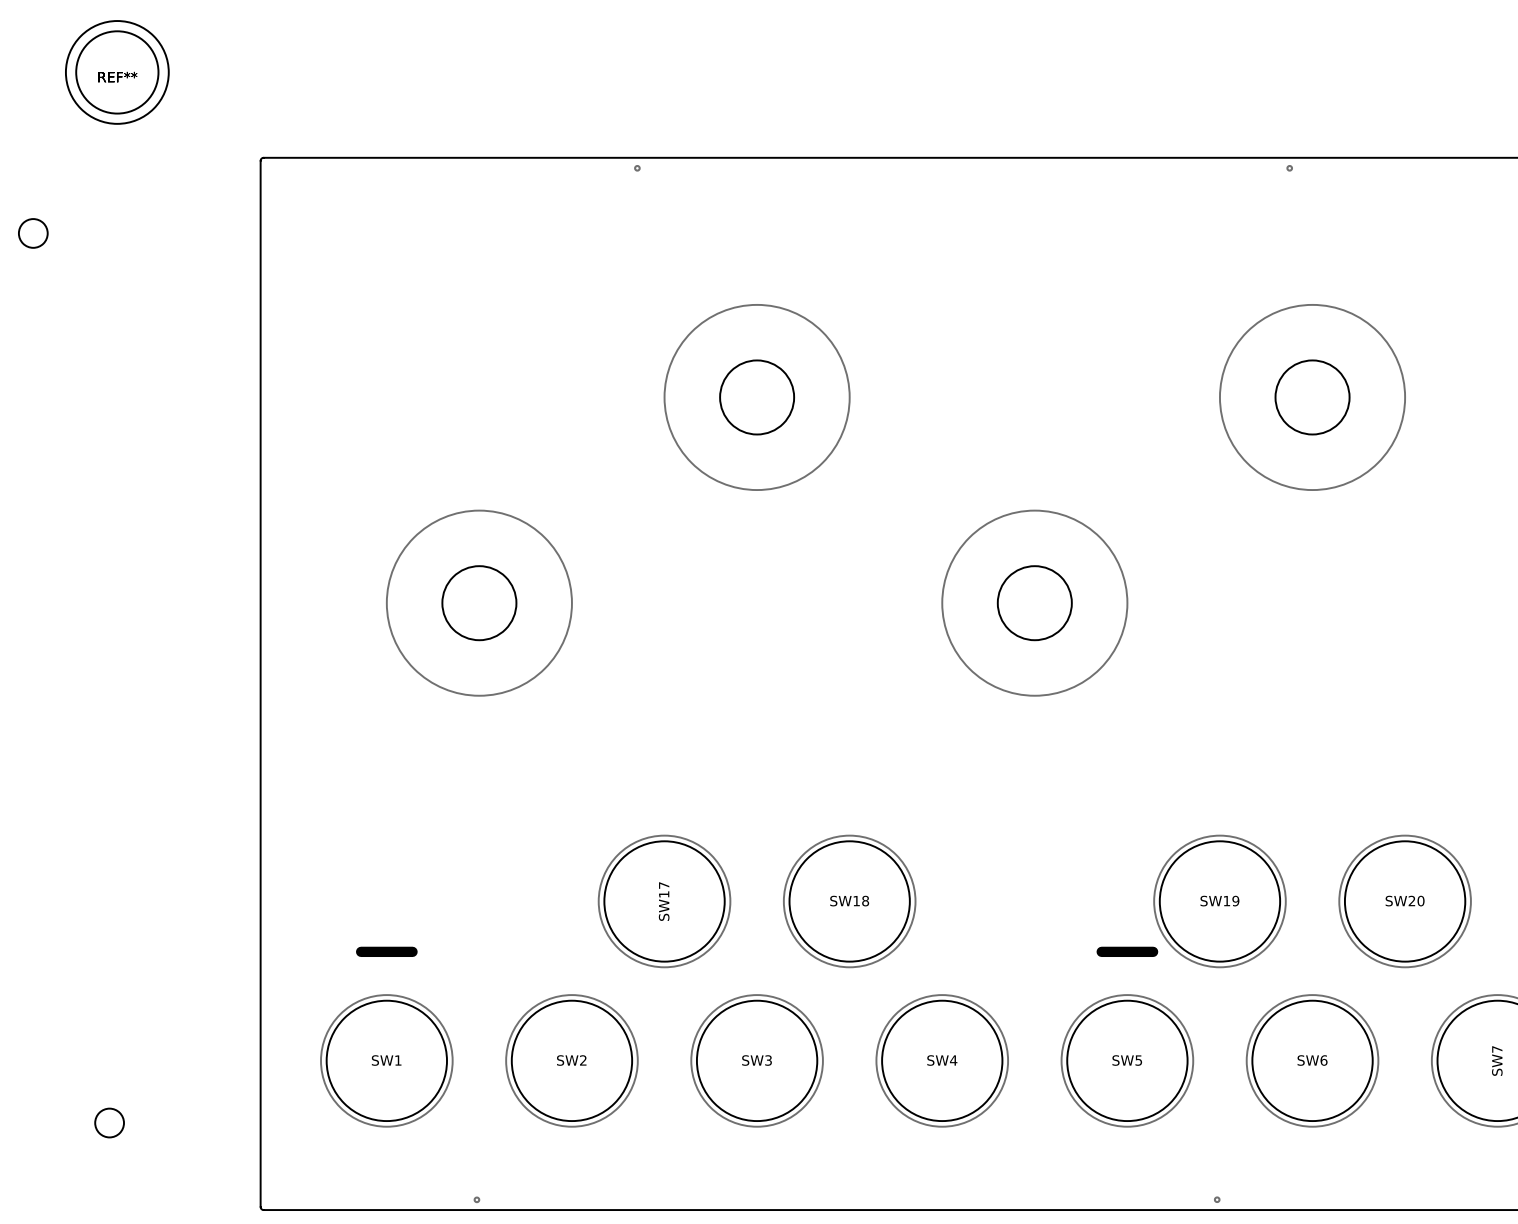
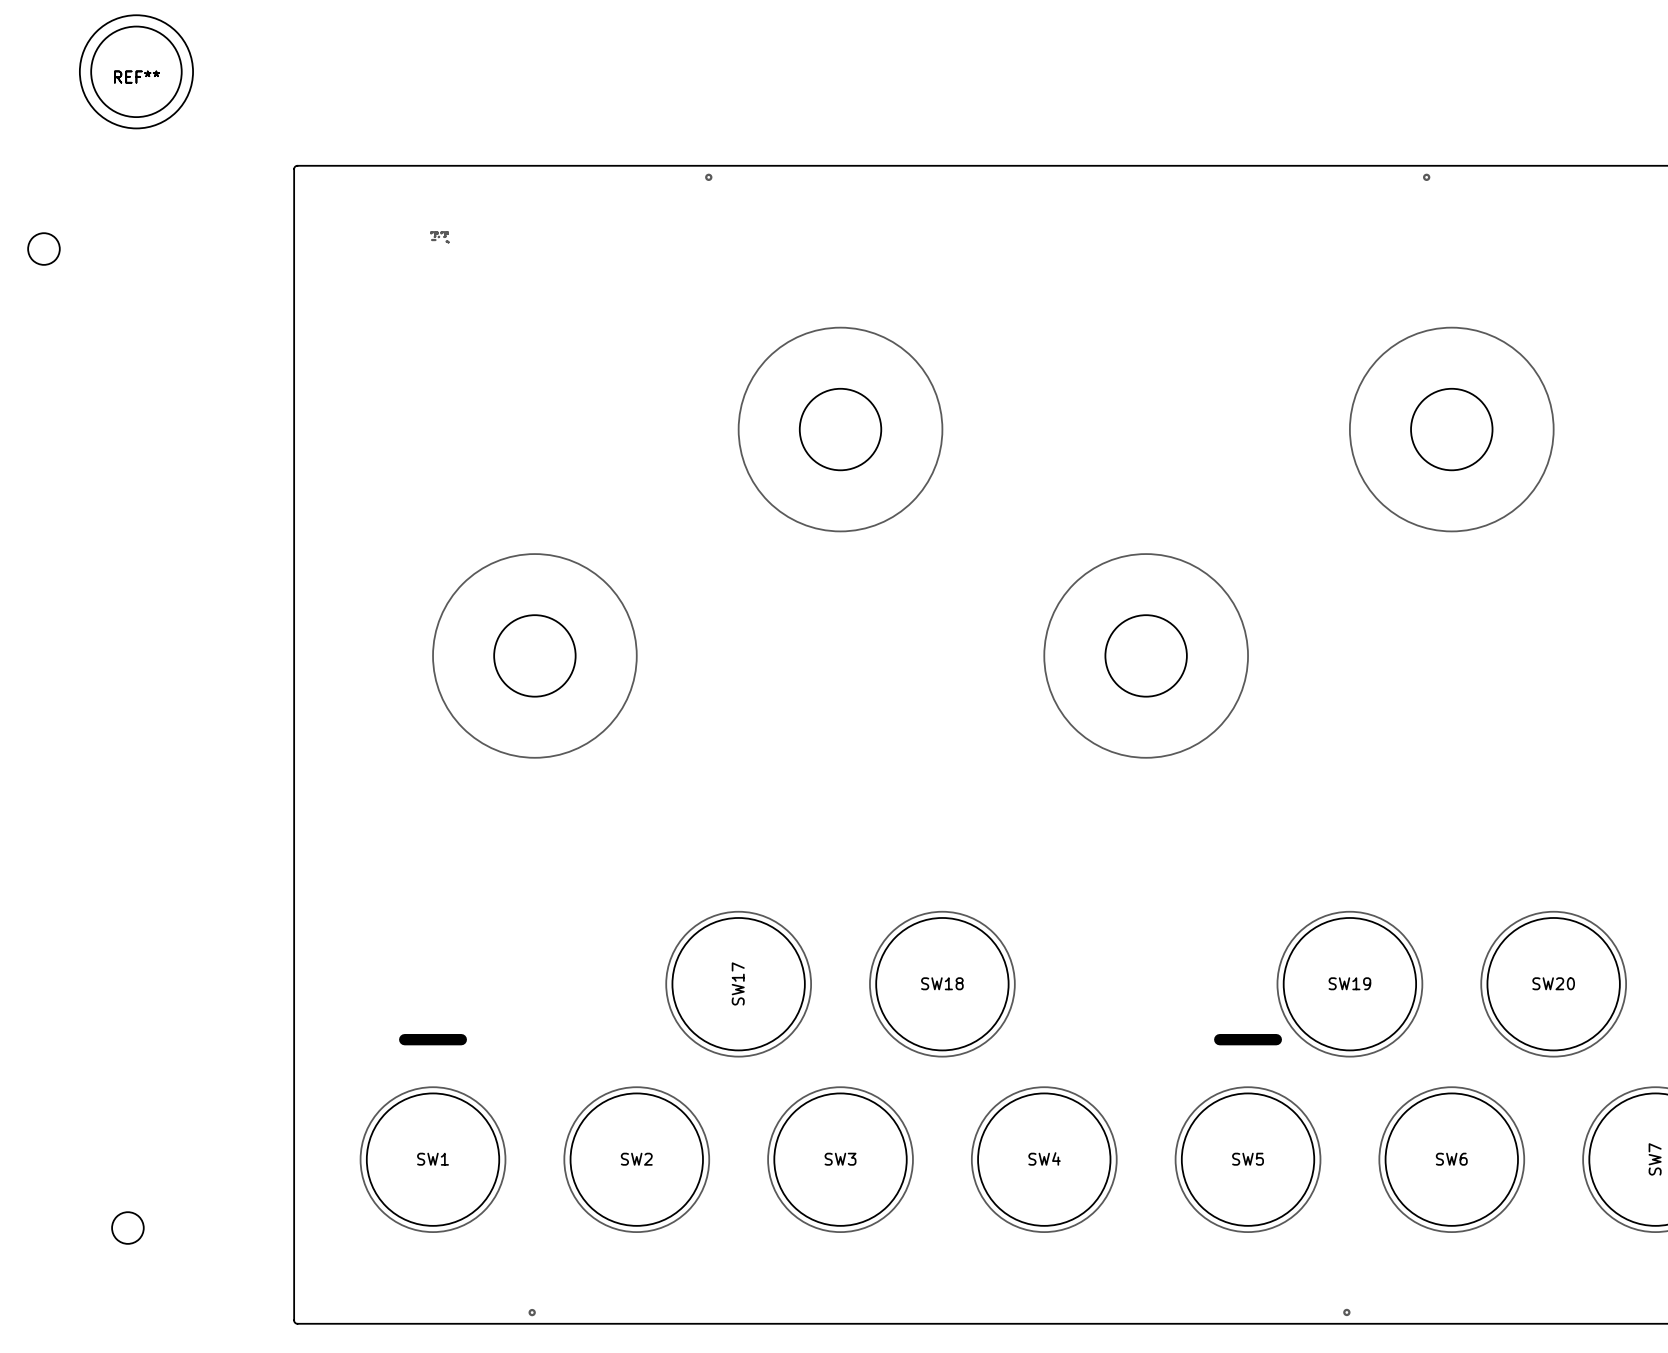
line: none -> (431, 233) (437, 232) (434, 236)
line: none -> (441, 233) (447, 232) (444, 236)
line: none -> (439, 236) (438, 237)
line: none -> (432, 240) (435, 240)
line: none -> (446, 241) (448, 242)

